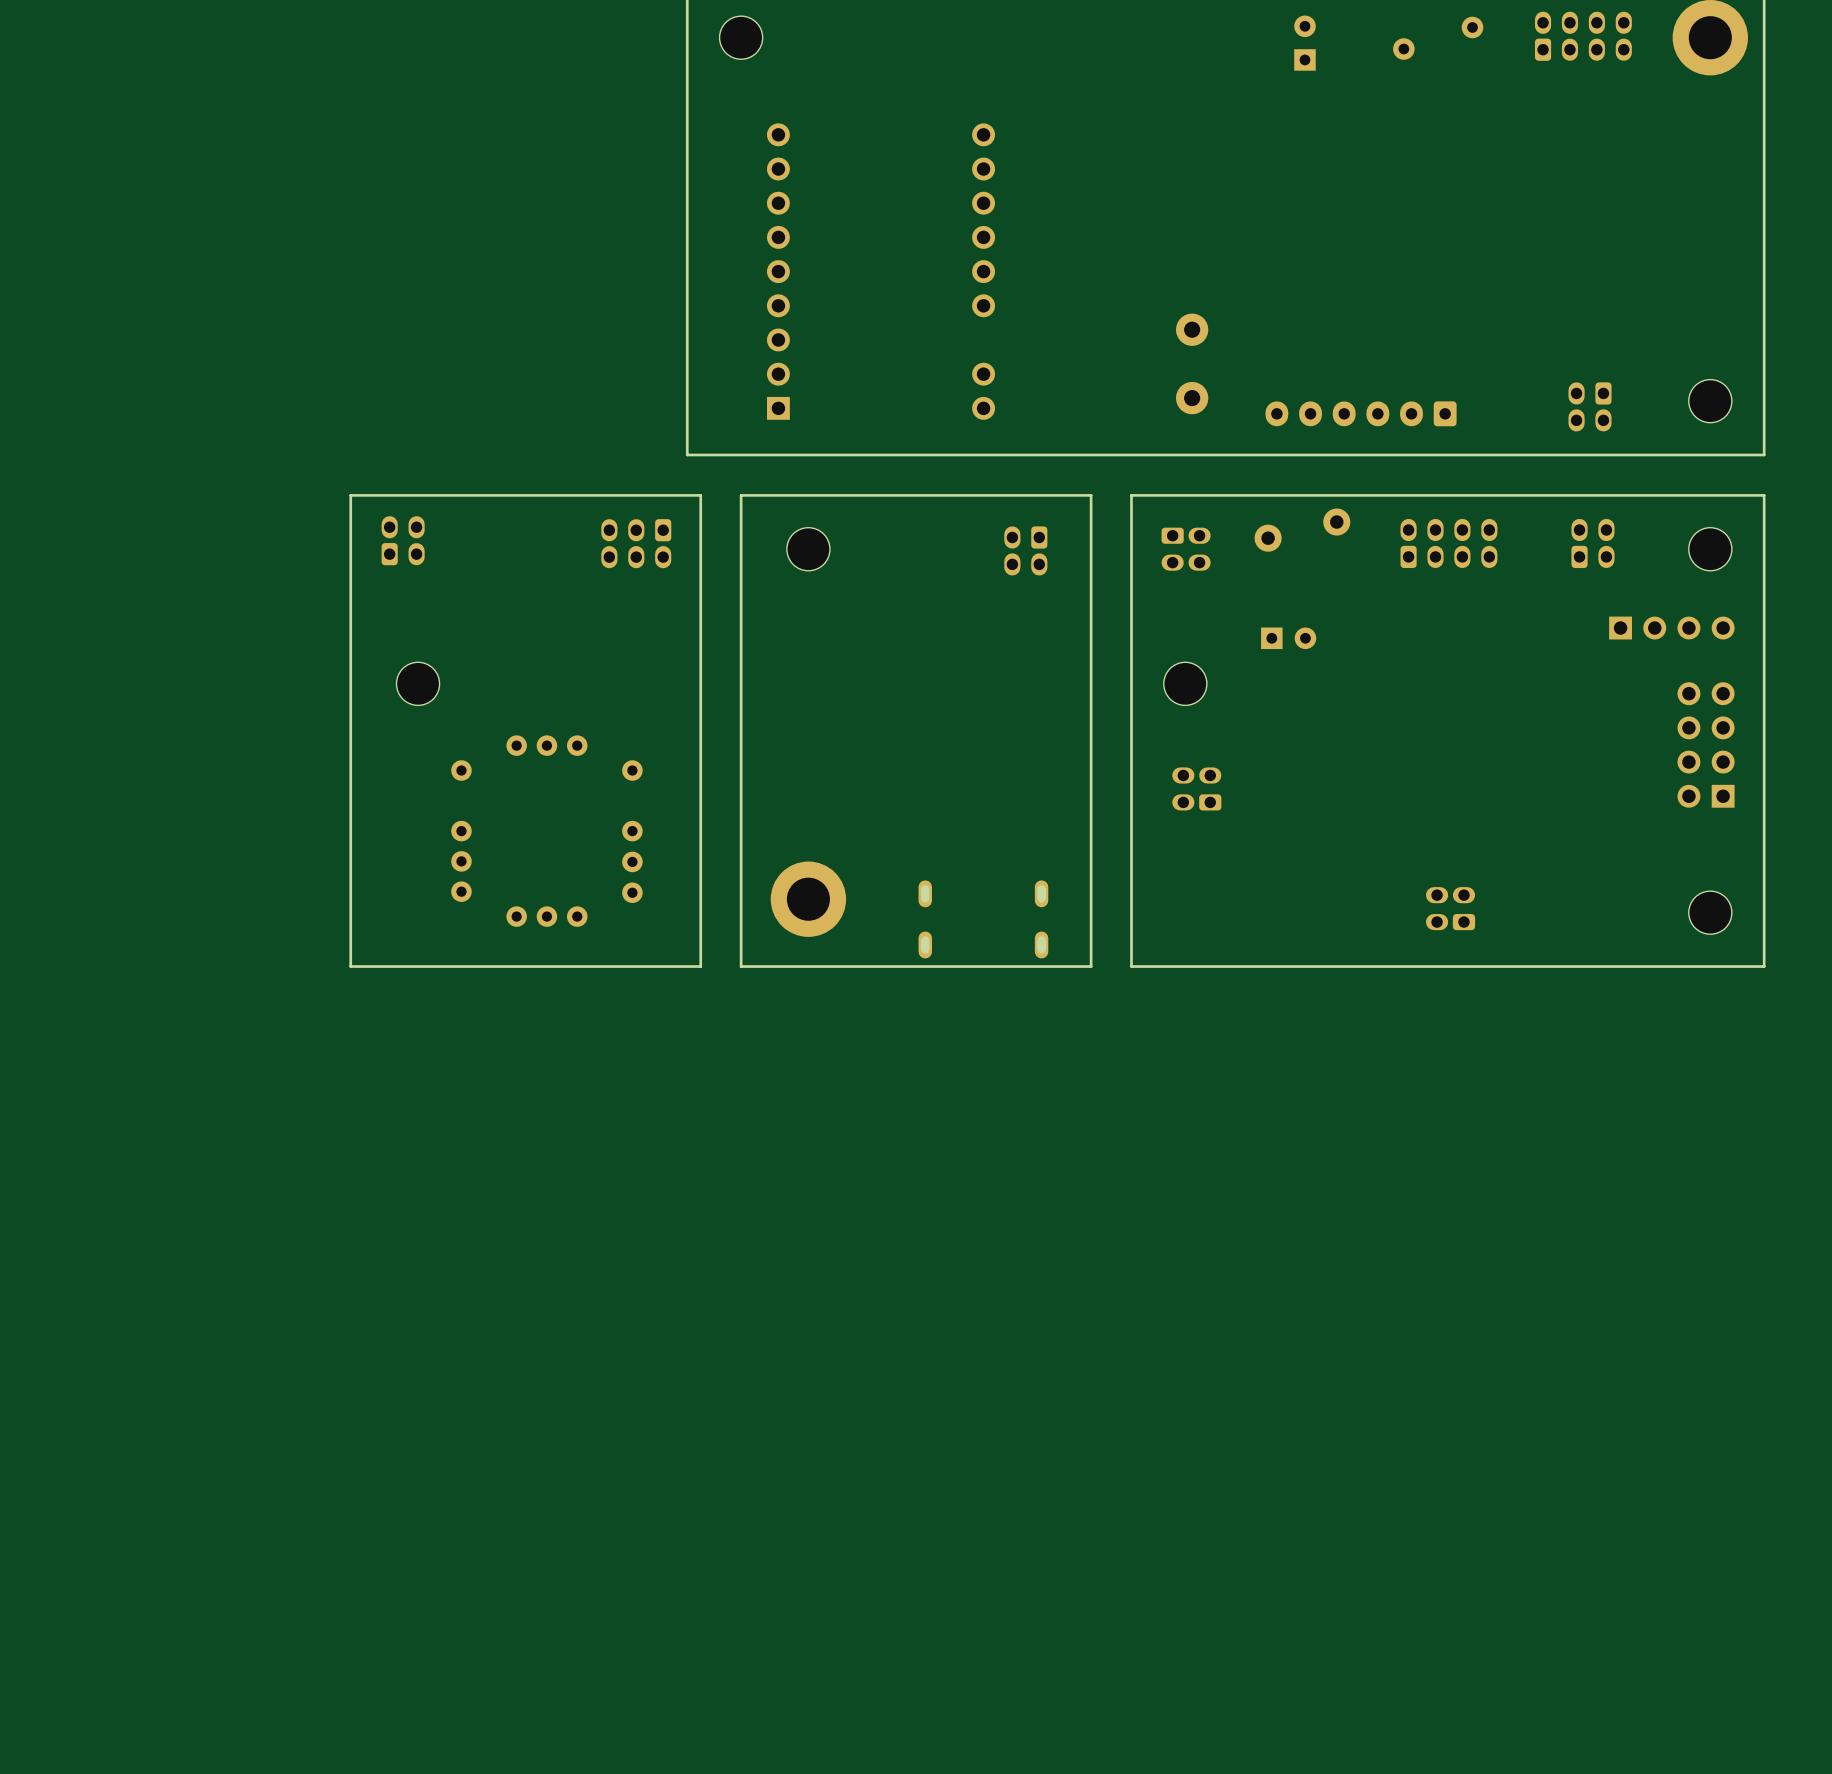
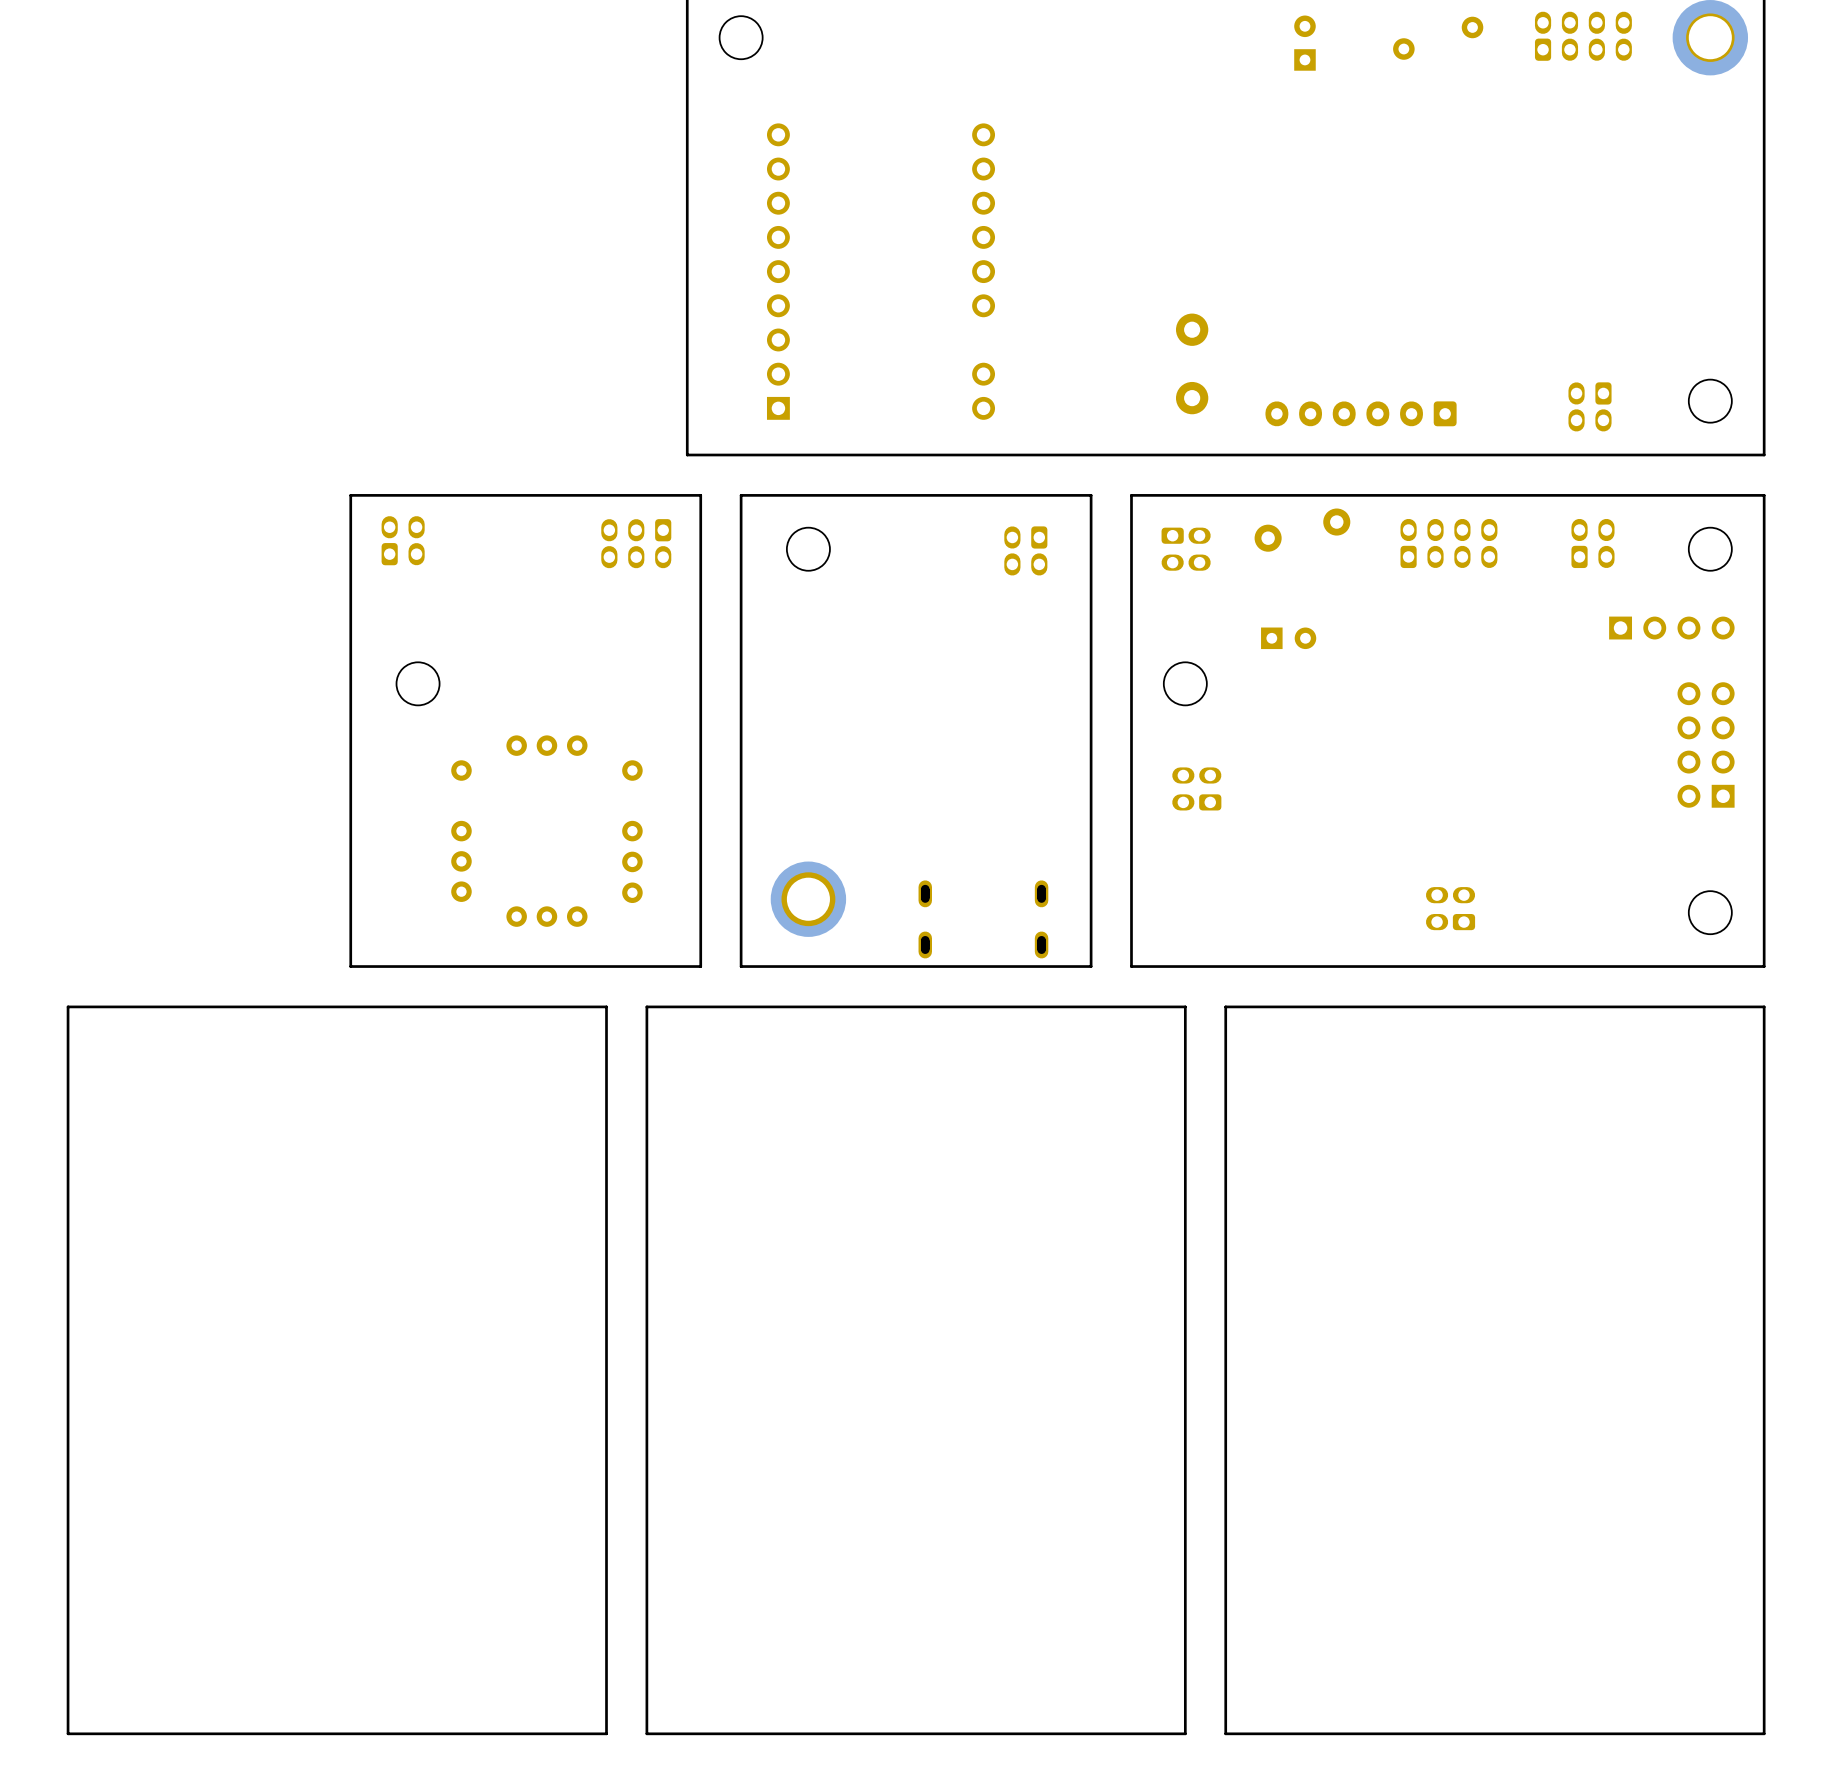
board edge: none -> (606, 1006) (68, 1006) (68, 1733) (606, 1733) (606, 1006)
board edge: none -> (1185, 1006) (646, 1006) (646, 1733) (1185, 1733) (1185, 1006)
board edge: none -> (1764, 1006) (1225, 1006) (1225, 1733) (1764, 1733) (1764, 1006)

